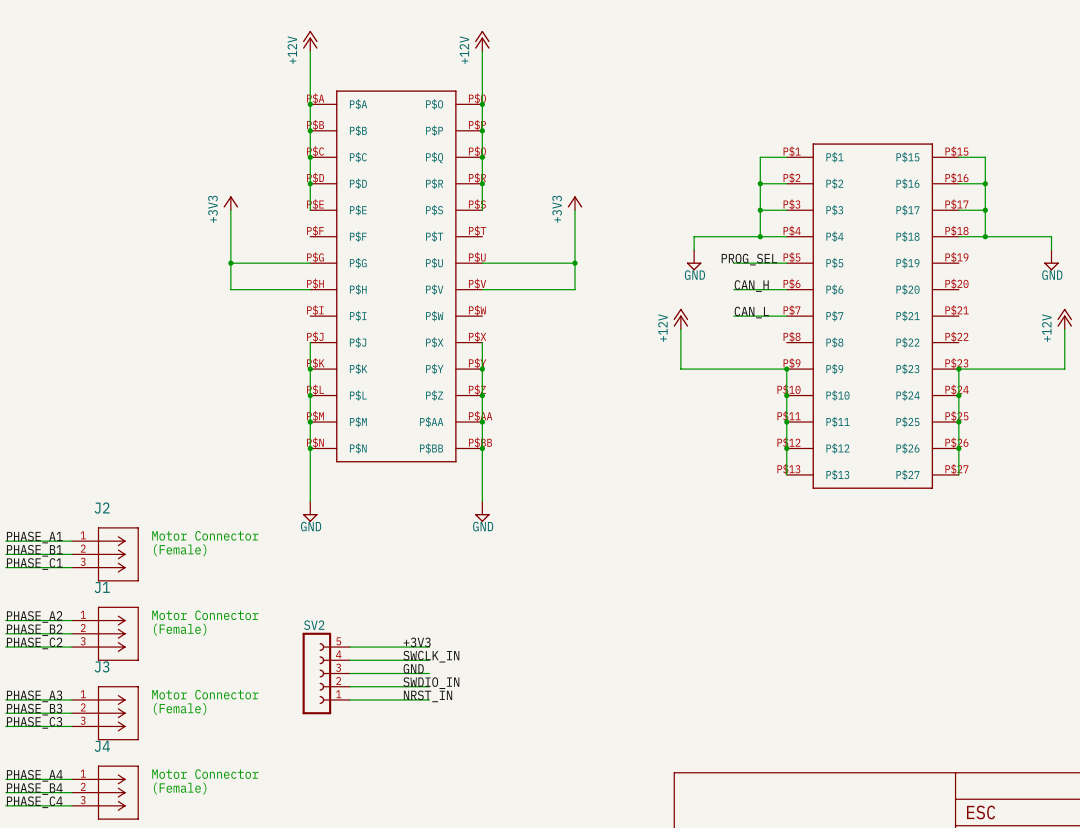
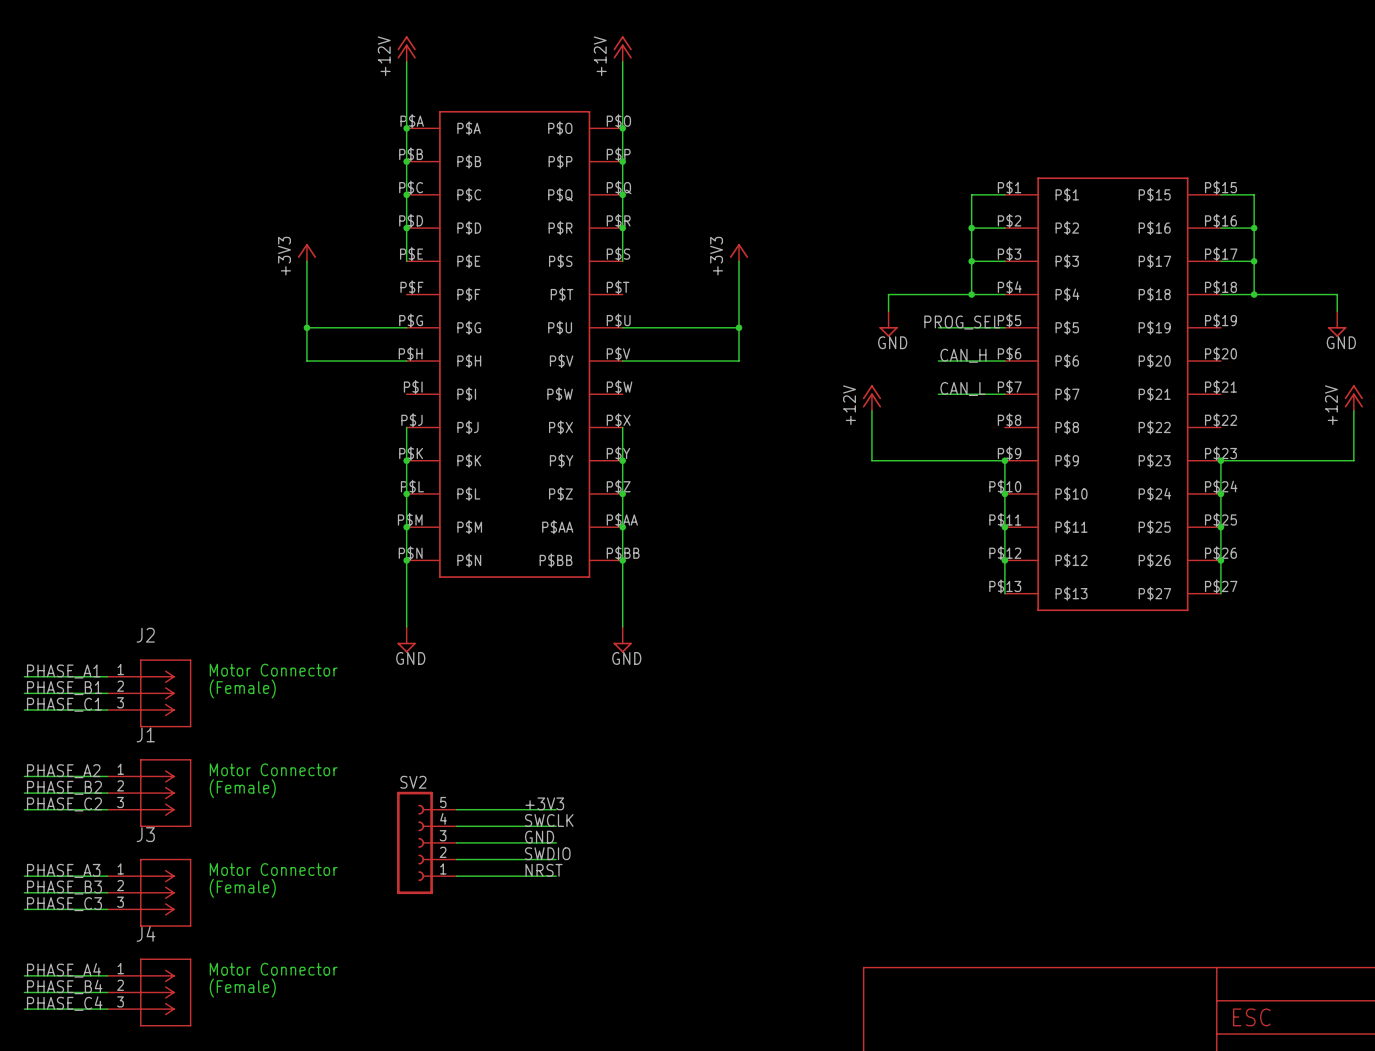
label: SWCLK_IN (431, 656) -> SWCLK (549, 820)
label: SWDIO_IN (431, 683) -> SWDIO (547, 853)
label: NRST_IN (428, 696) -> NRST (544, 870)

